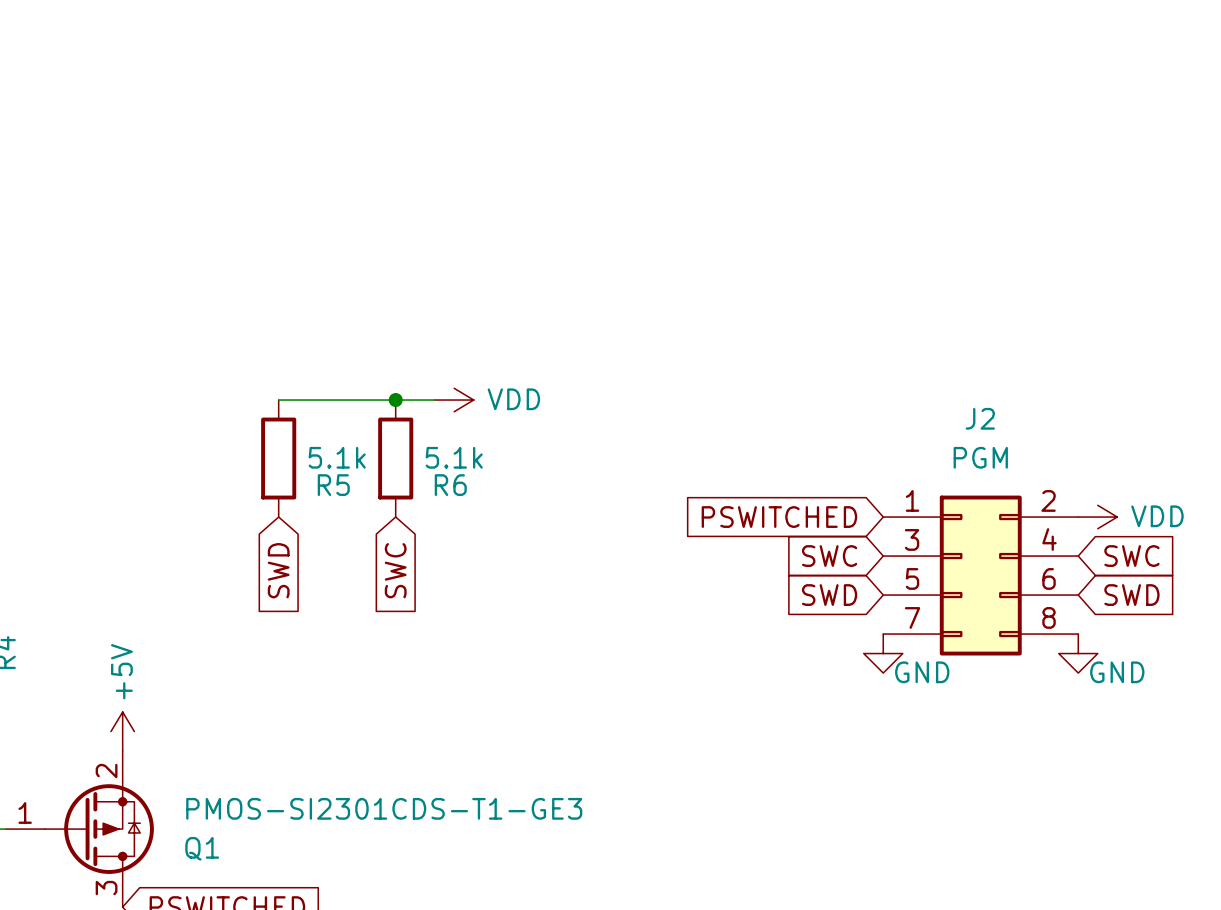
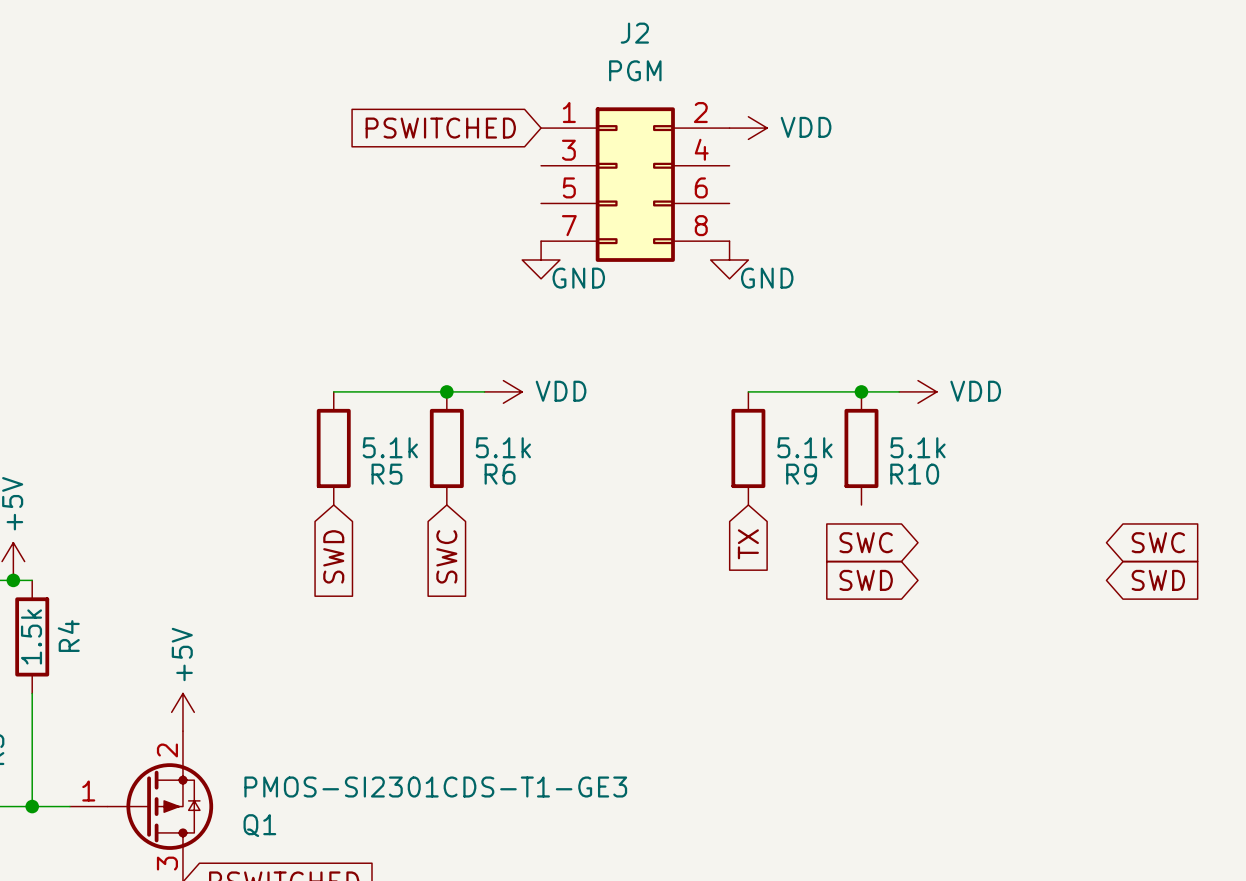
global label: none -> PSWITCHED (440, 128)
power symbol: none -> VDD (748, 128)
power symbol: none -> GND (541, 260)
power symbol: none -> GND (729, 260)
wire: none -> (748, 391) (899, 391)
junction: none -> (861, 391)
R9: none -> 5.1k (748, 448)
R10: none -> 5.1k (861, 448)
global label: PSWITCHED (779, 517) -> none
power symbol position: VDD (1097, 517) -> VDD (918, 391)
global label: none -> TX (748, 544)
J2 position: (980, 575) -> (635, 184)
power symbol: GND (883, 653) -> none
power symbol: GND (1078, 653) -> none

